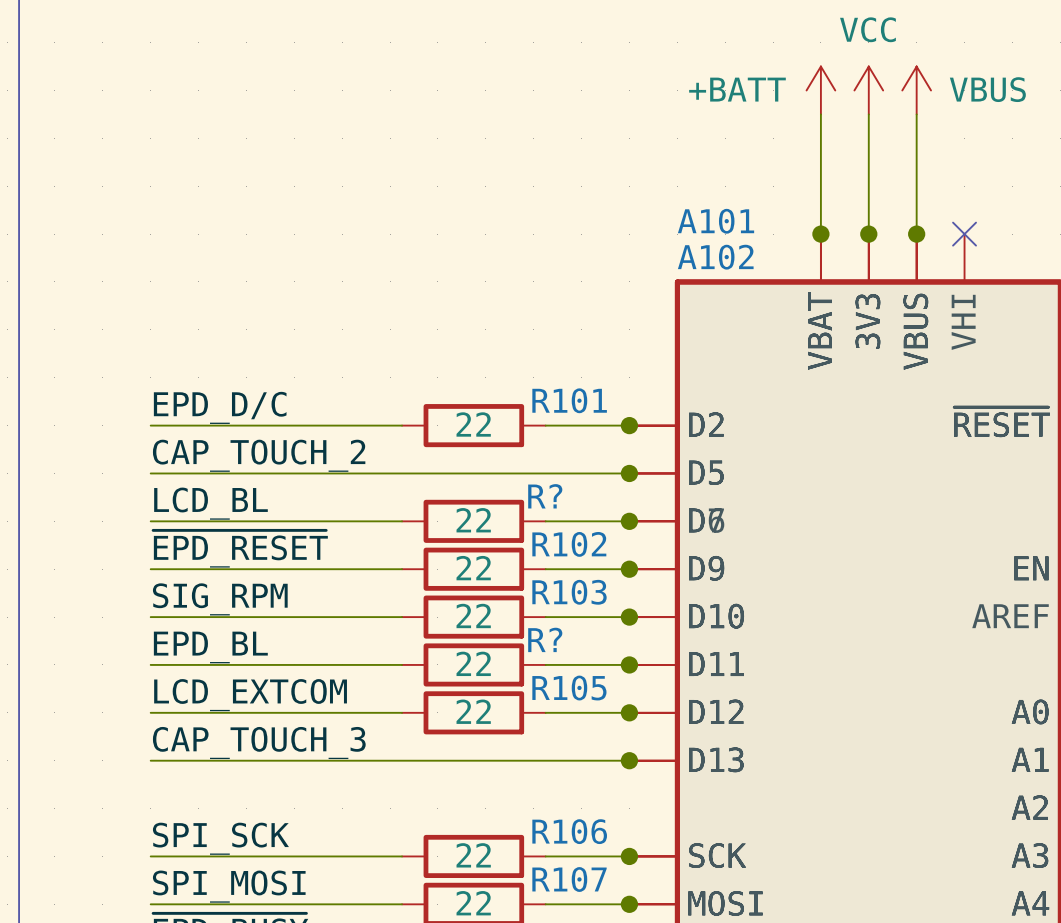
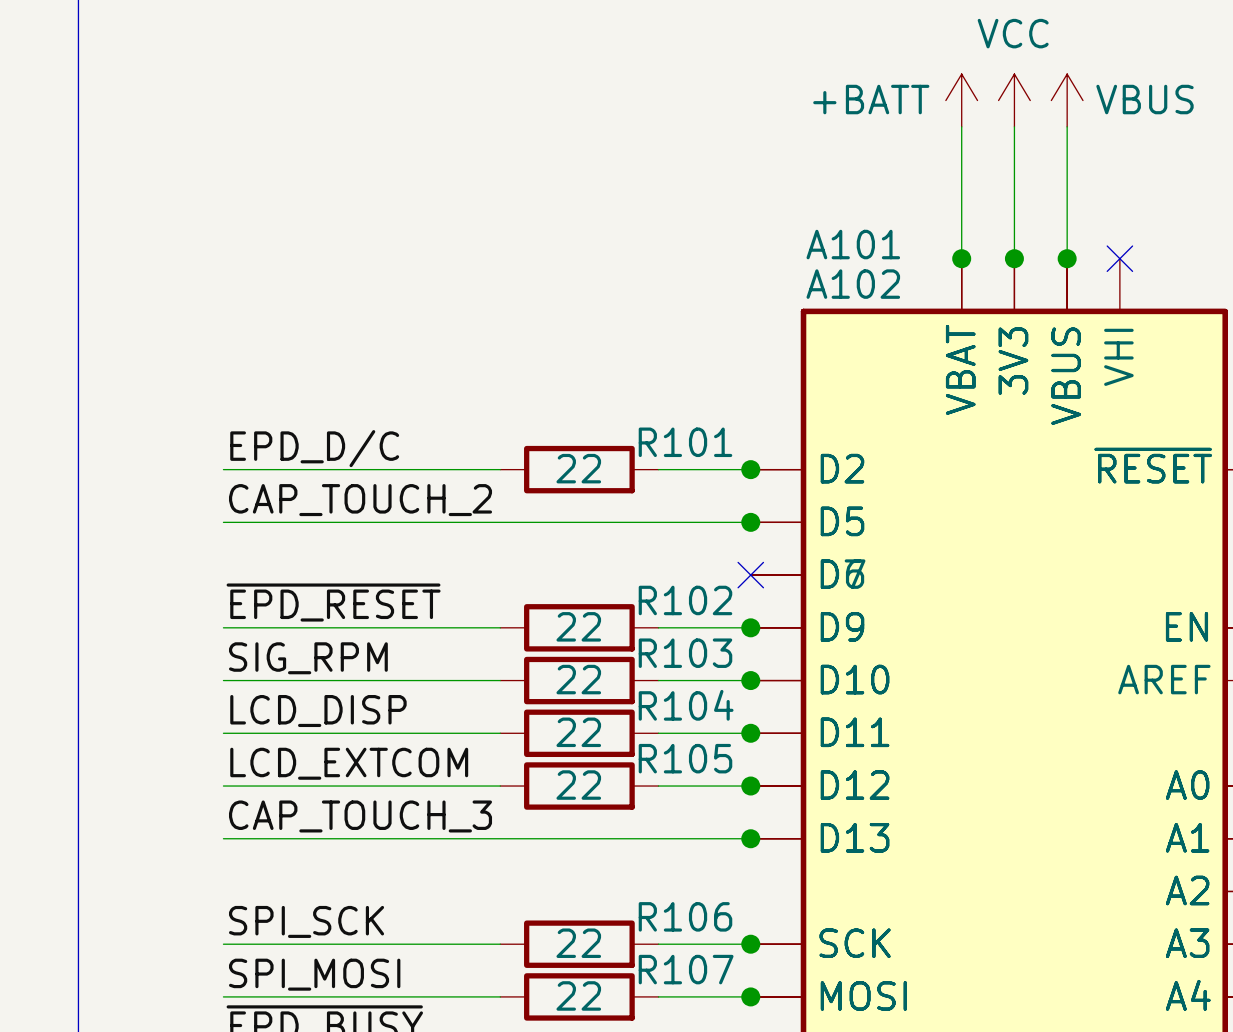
label: LCD_BL (210, 503) -> none
wire: (150, 521) (402, 521) -> none
R?: 22 (473, 521) -> none
wire: (545, 521) (629, 521) -> none
junction: (629, 521) -> none
no-connect mark: none -> (750, 575)
R? name: R? (545, 639) -> R104 (686, 705)
label: EPD_BL (210, 647) -> LCD_DISP (318, 711)

